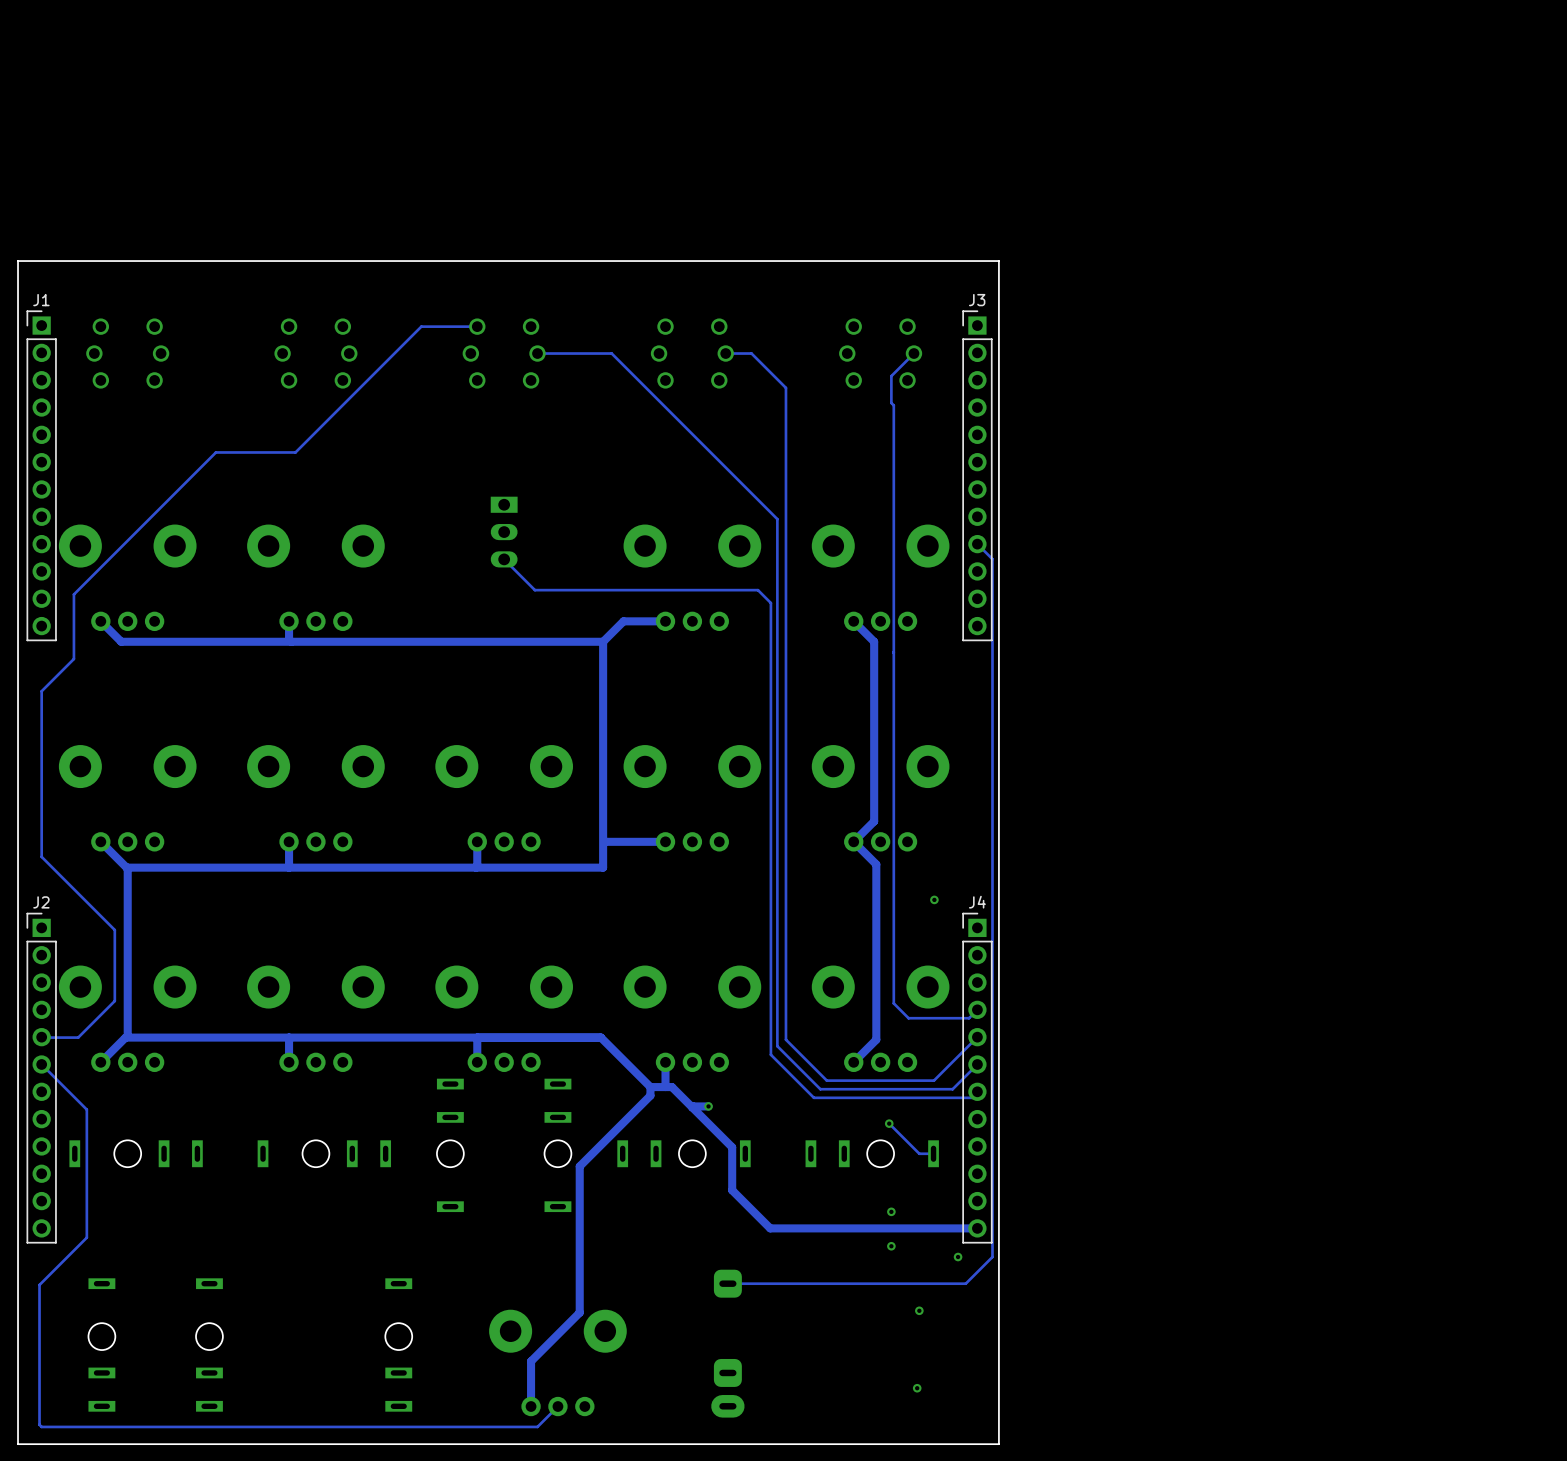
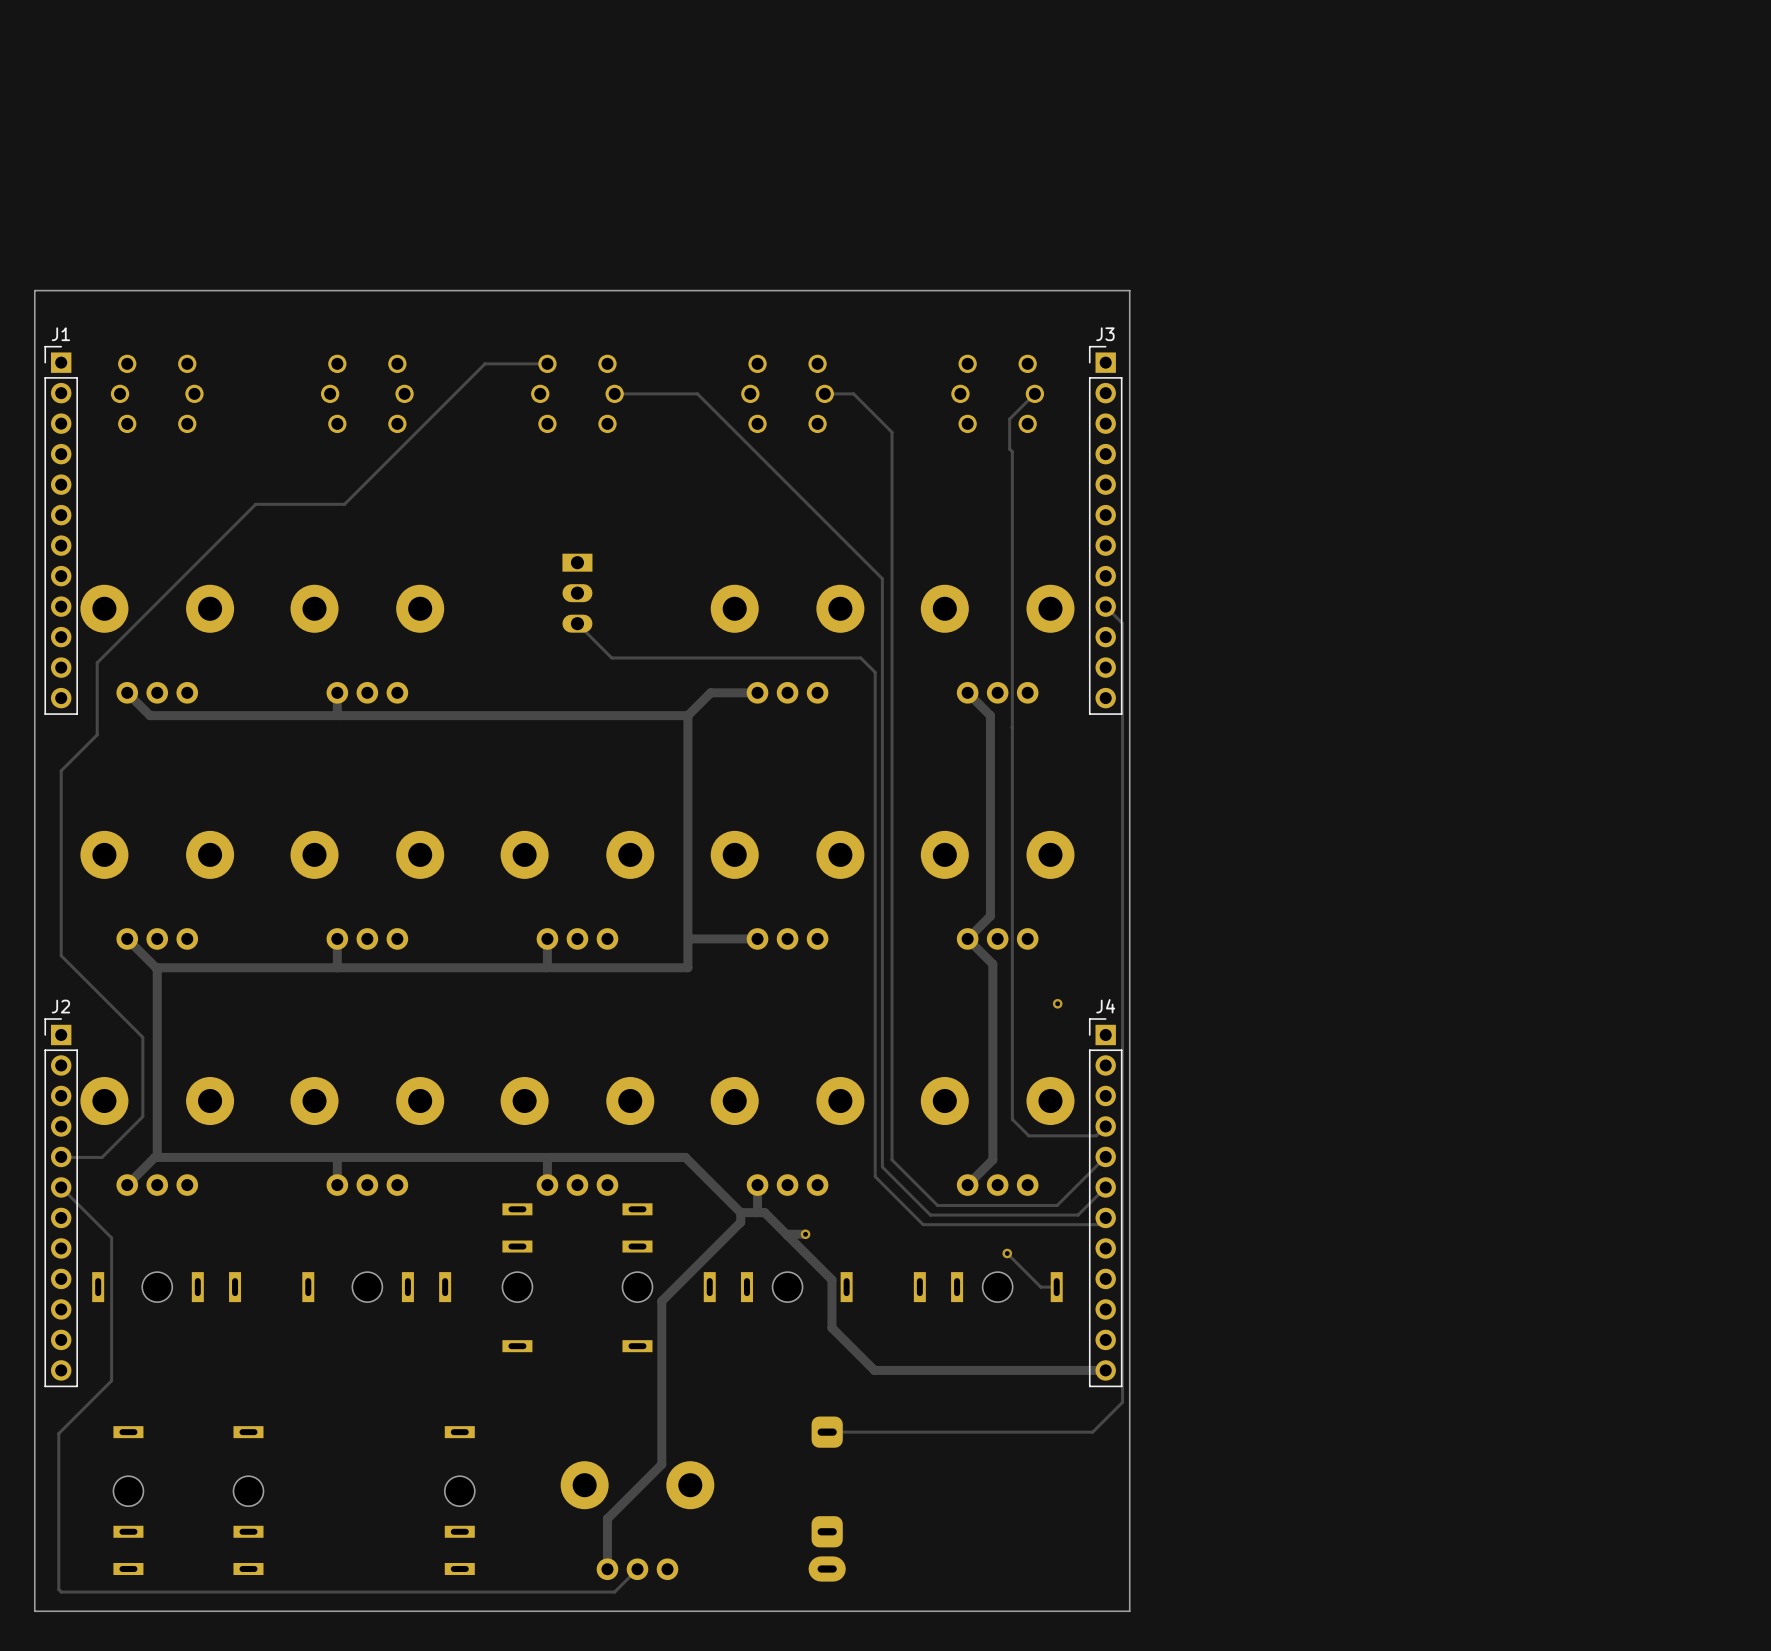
via: (891, 1211) -> none
via: (891, 1246) -> none
via: (958, 1257) -> none
via: (919, 1310) -> none
via: (917, 1388) -> none

